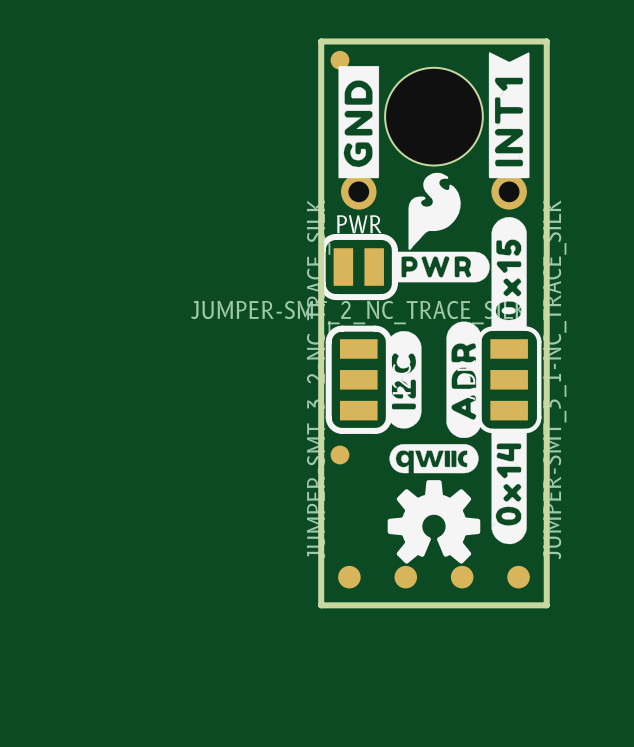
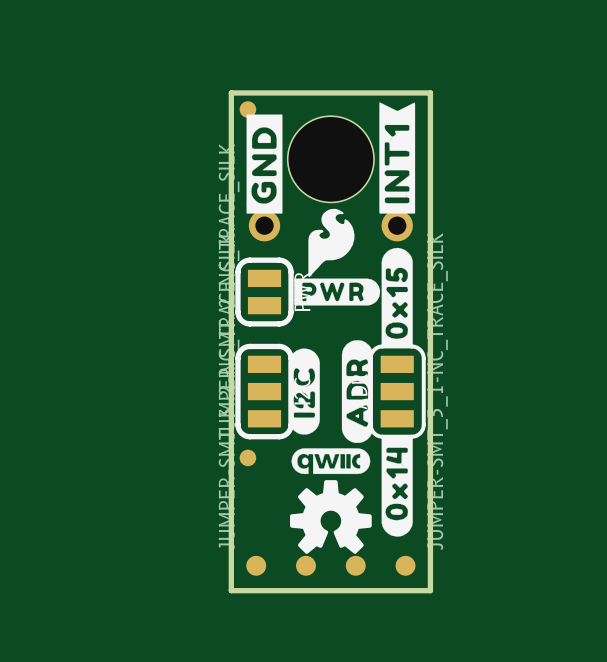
PWR rotation: 0° (358, 267) -> 90° clockwise (264, 292)

